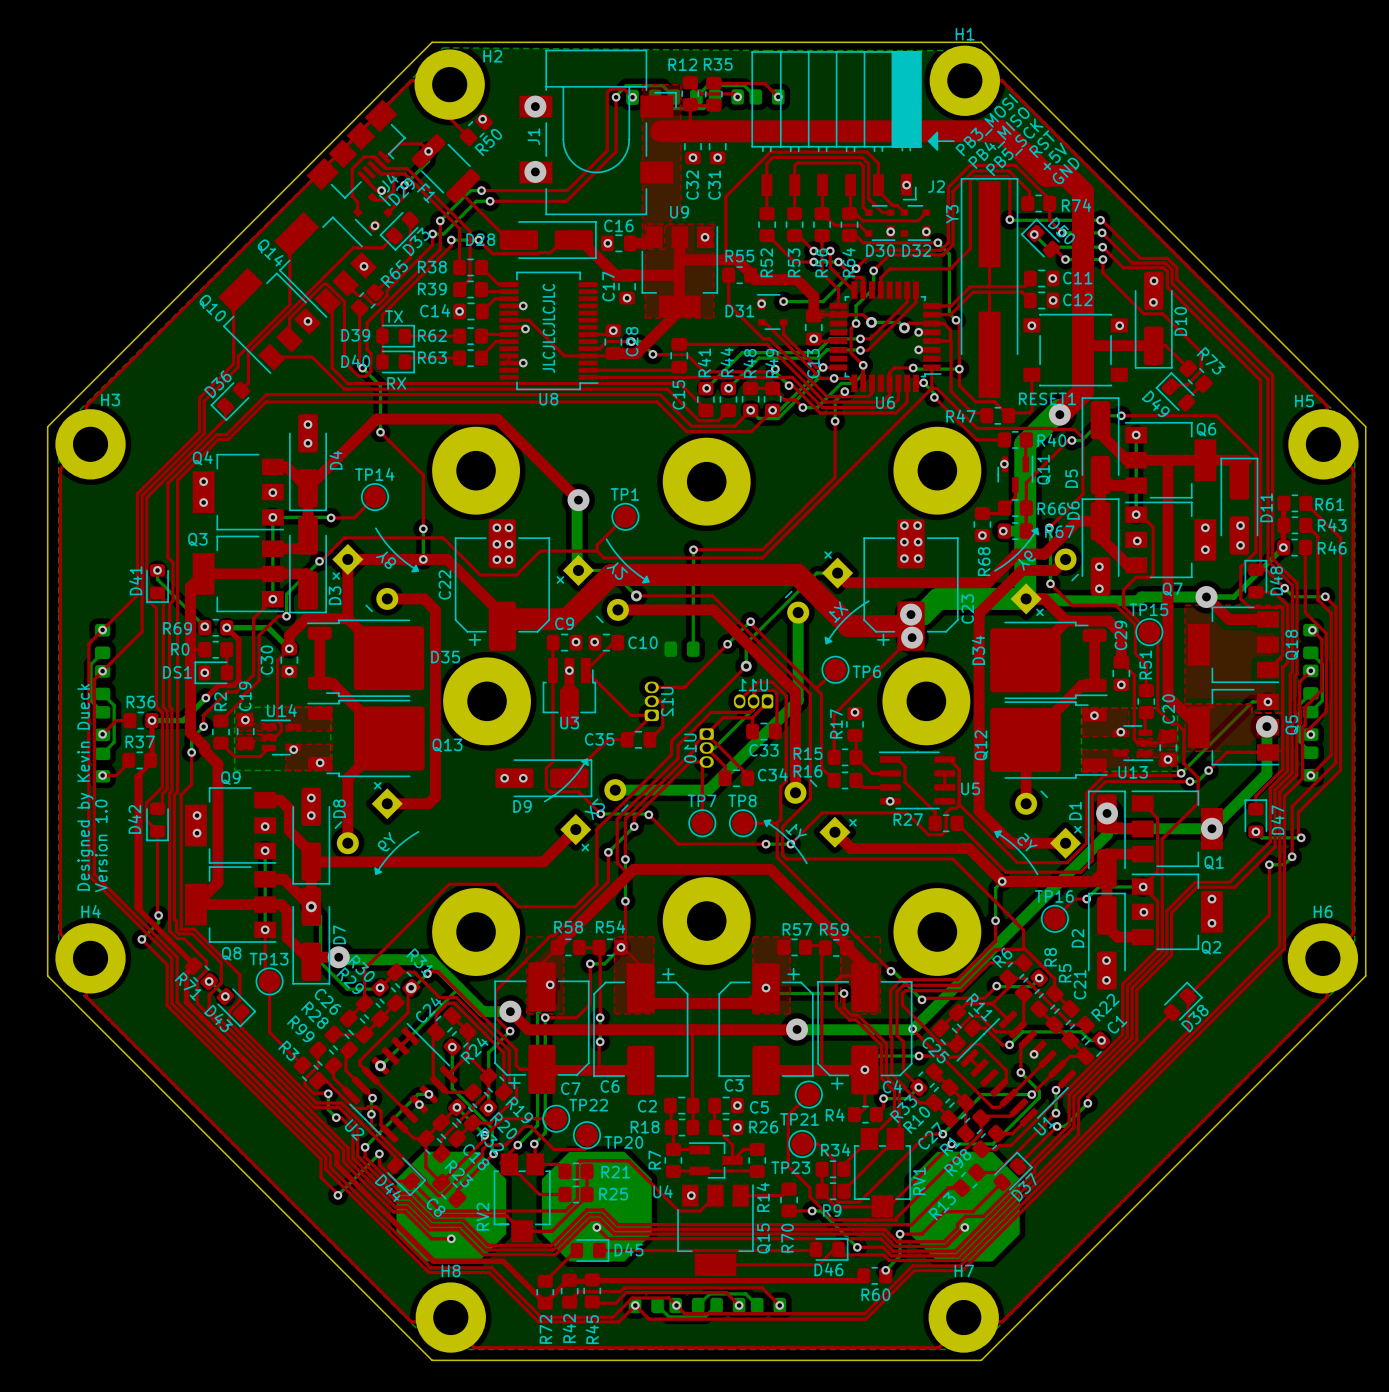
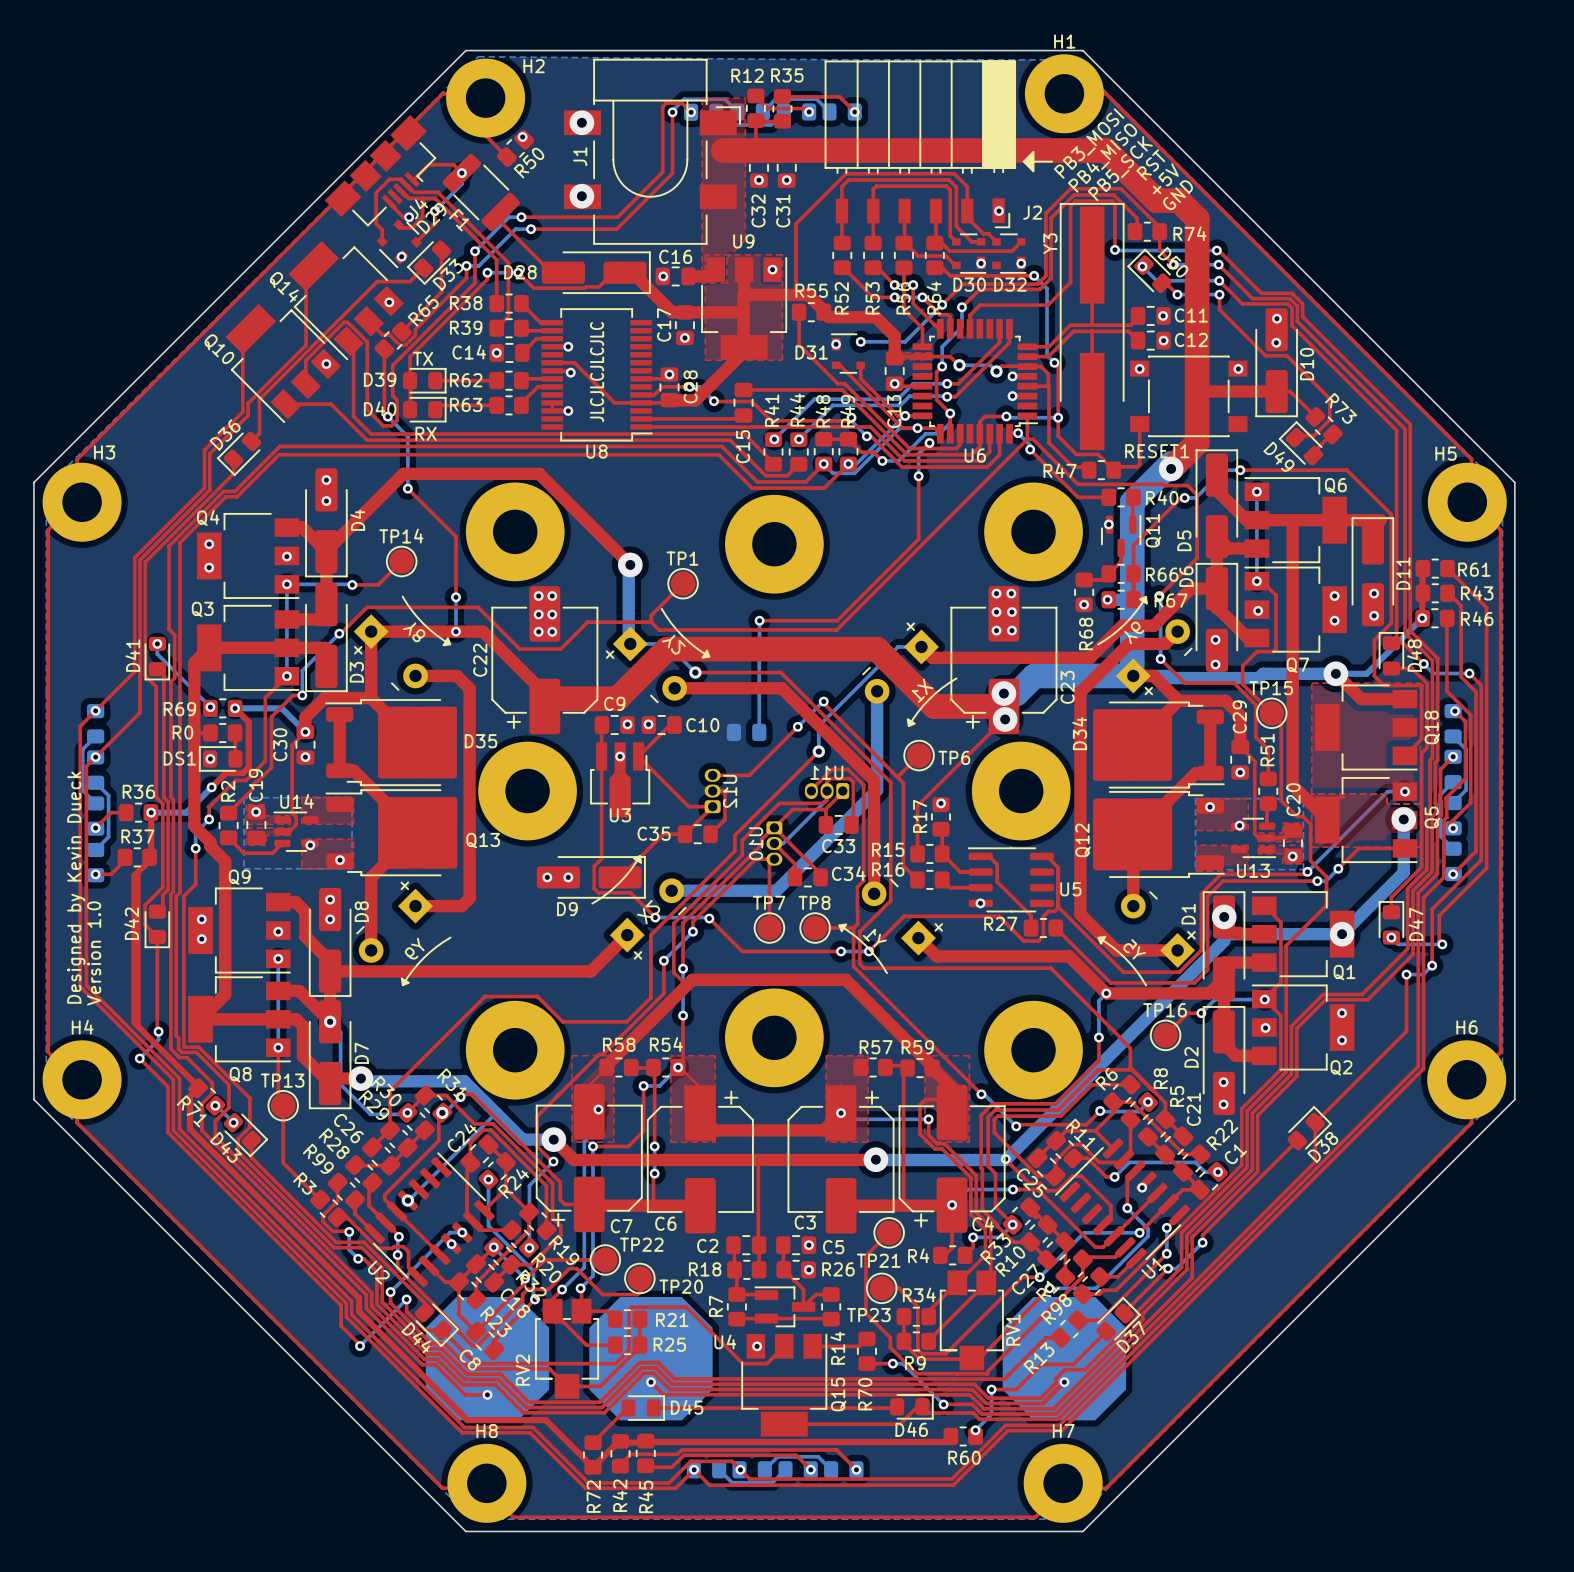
top track: (944, 773) (944, 787) -> none
top track: (410, 1036) (400, 1046) -> none
top track: (969, 1058) (979, 1067) -> none

